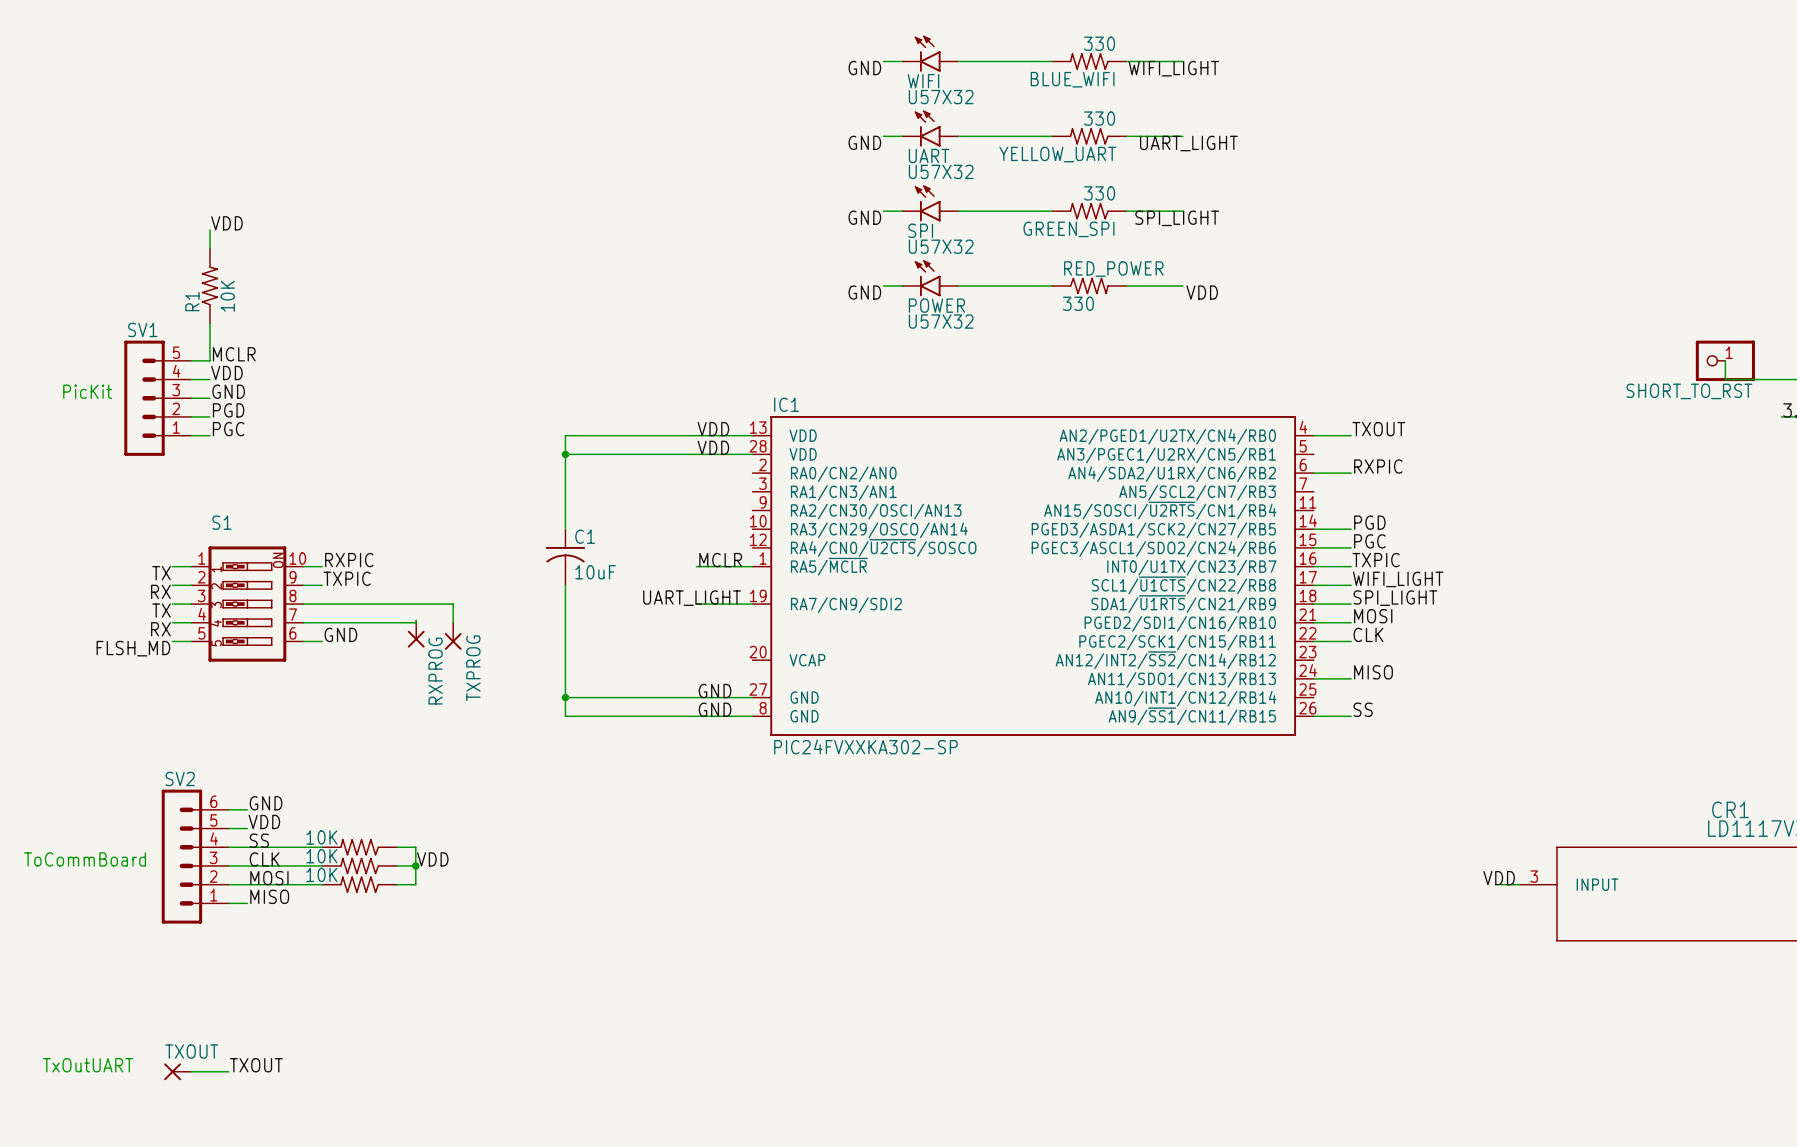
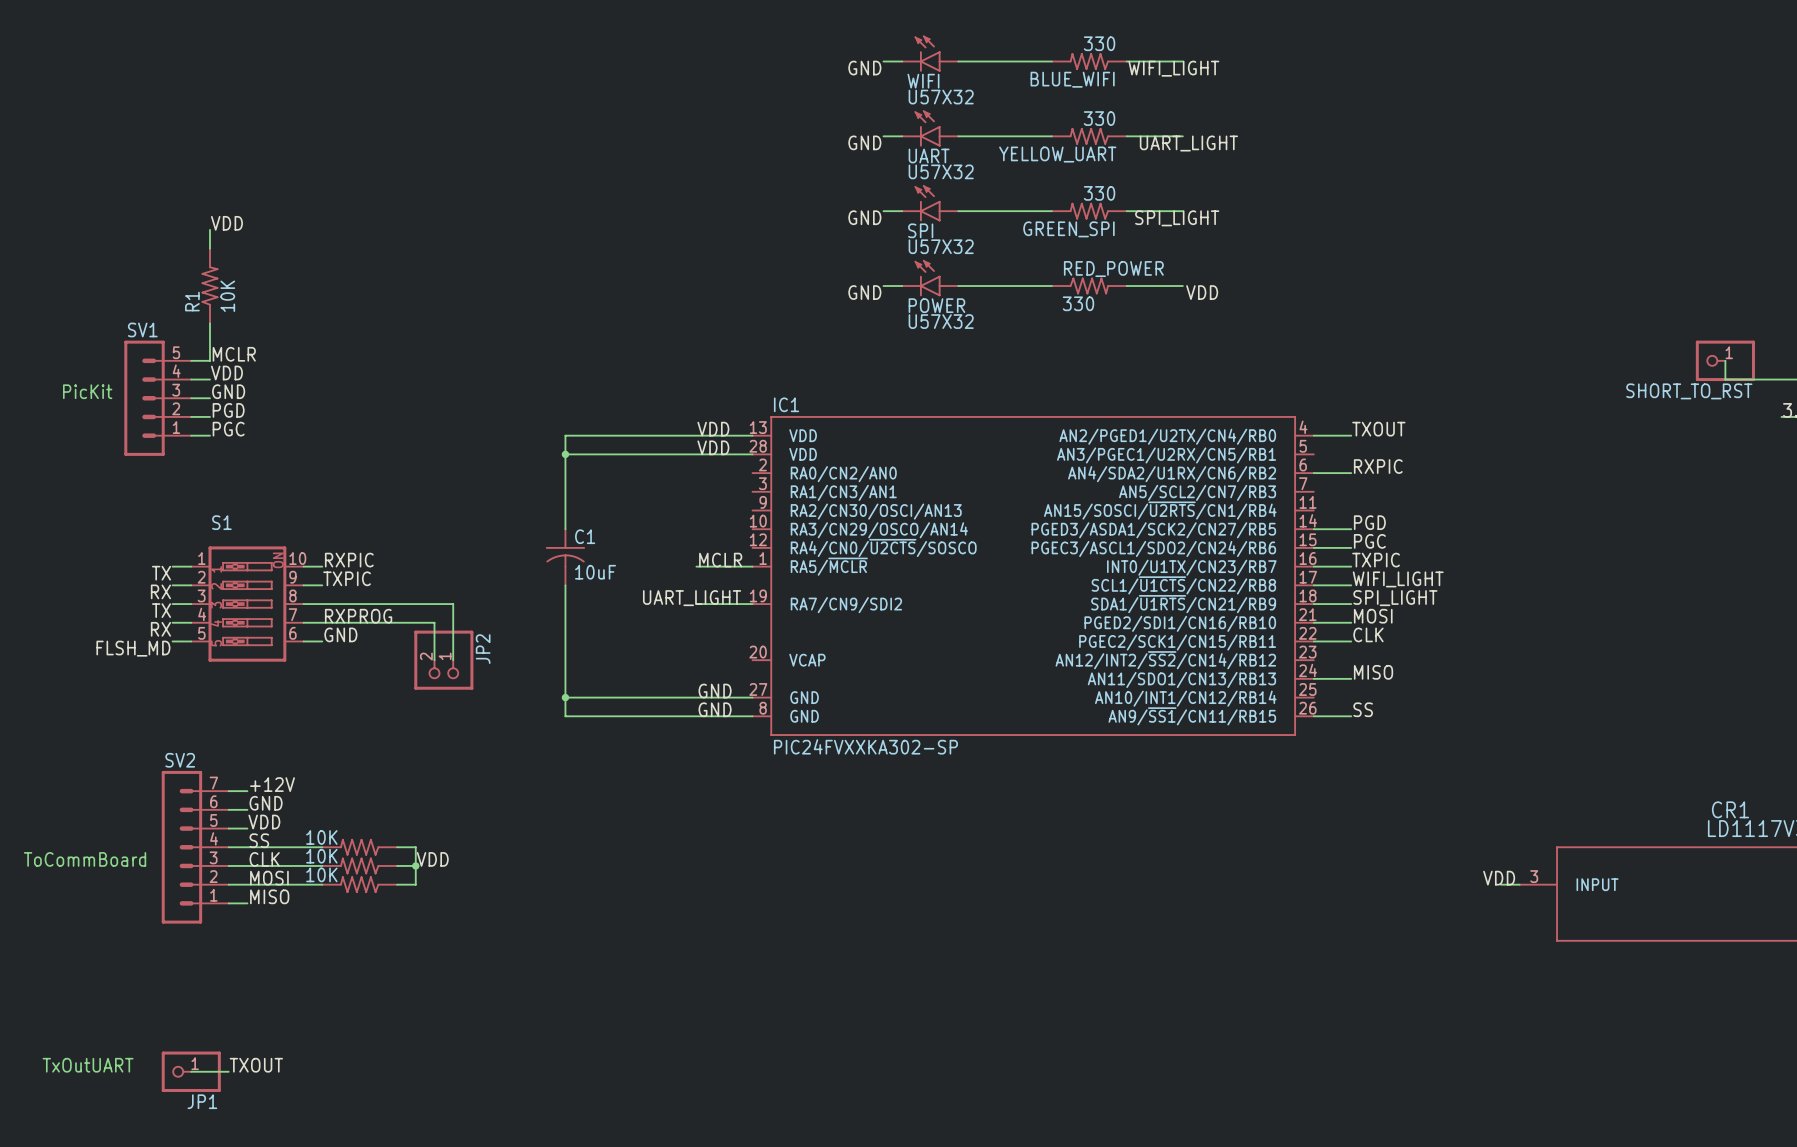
label: none -> RXPROG (358, 616)
wire: (416, 620) (416, 622) -> (434, 660) (434, 622) (416, 622)
RXPROG: (416, 634) -> none
TXPROG: (453, 636) -> none
JP2: none -> (443, 660)
label: none -> +12V (272, 784)
SV2 symbol: [161, 789, 229, 924] -> [161, 770, 229, 924]
wire: none -> (228, 791) (247, 791)
TXOUT: (177, 1071) -> none
JP1: none -> (191, 1071)

